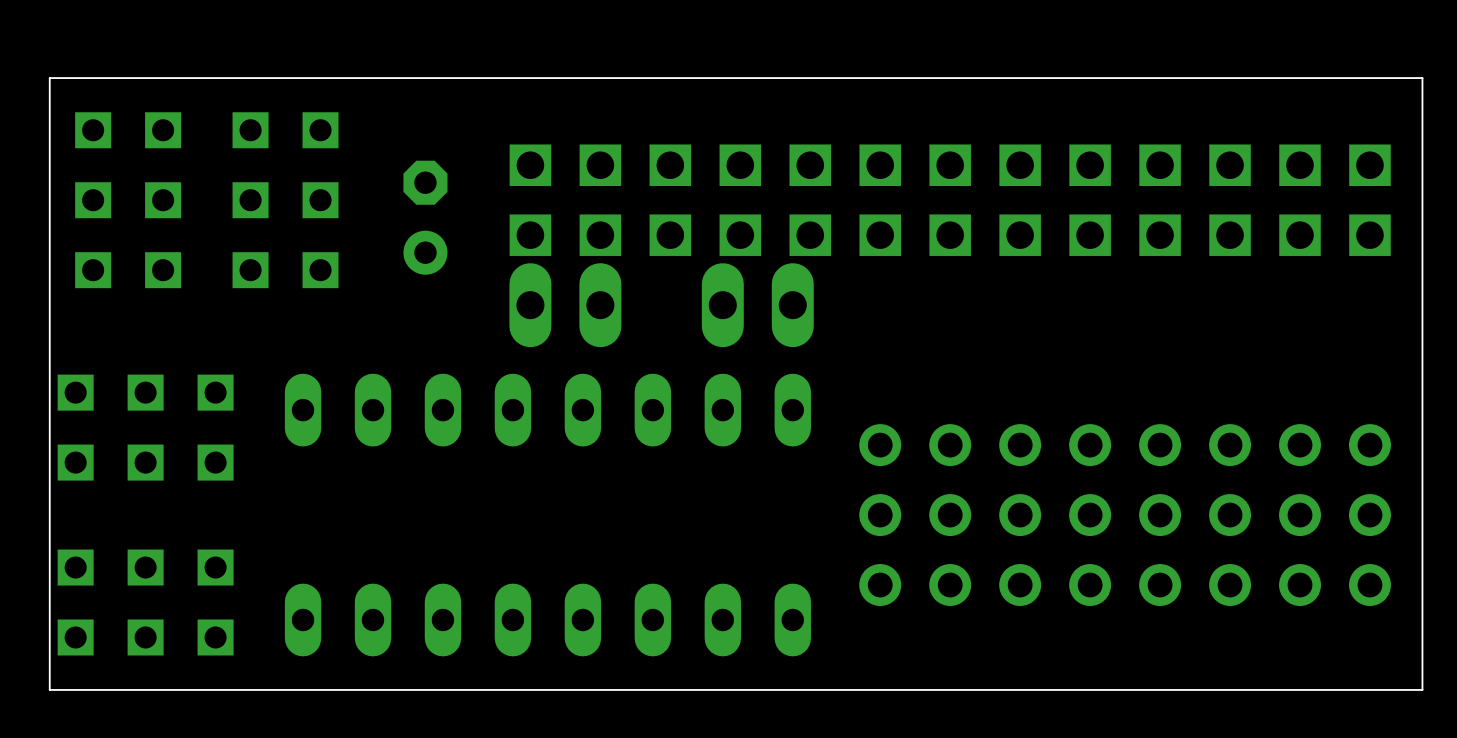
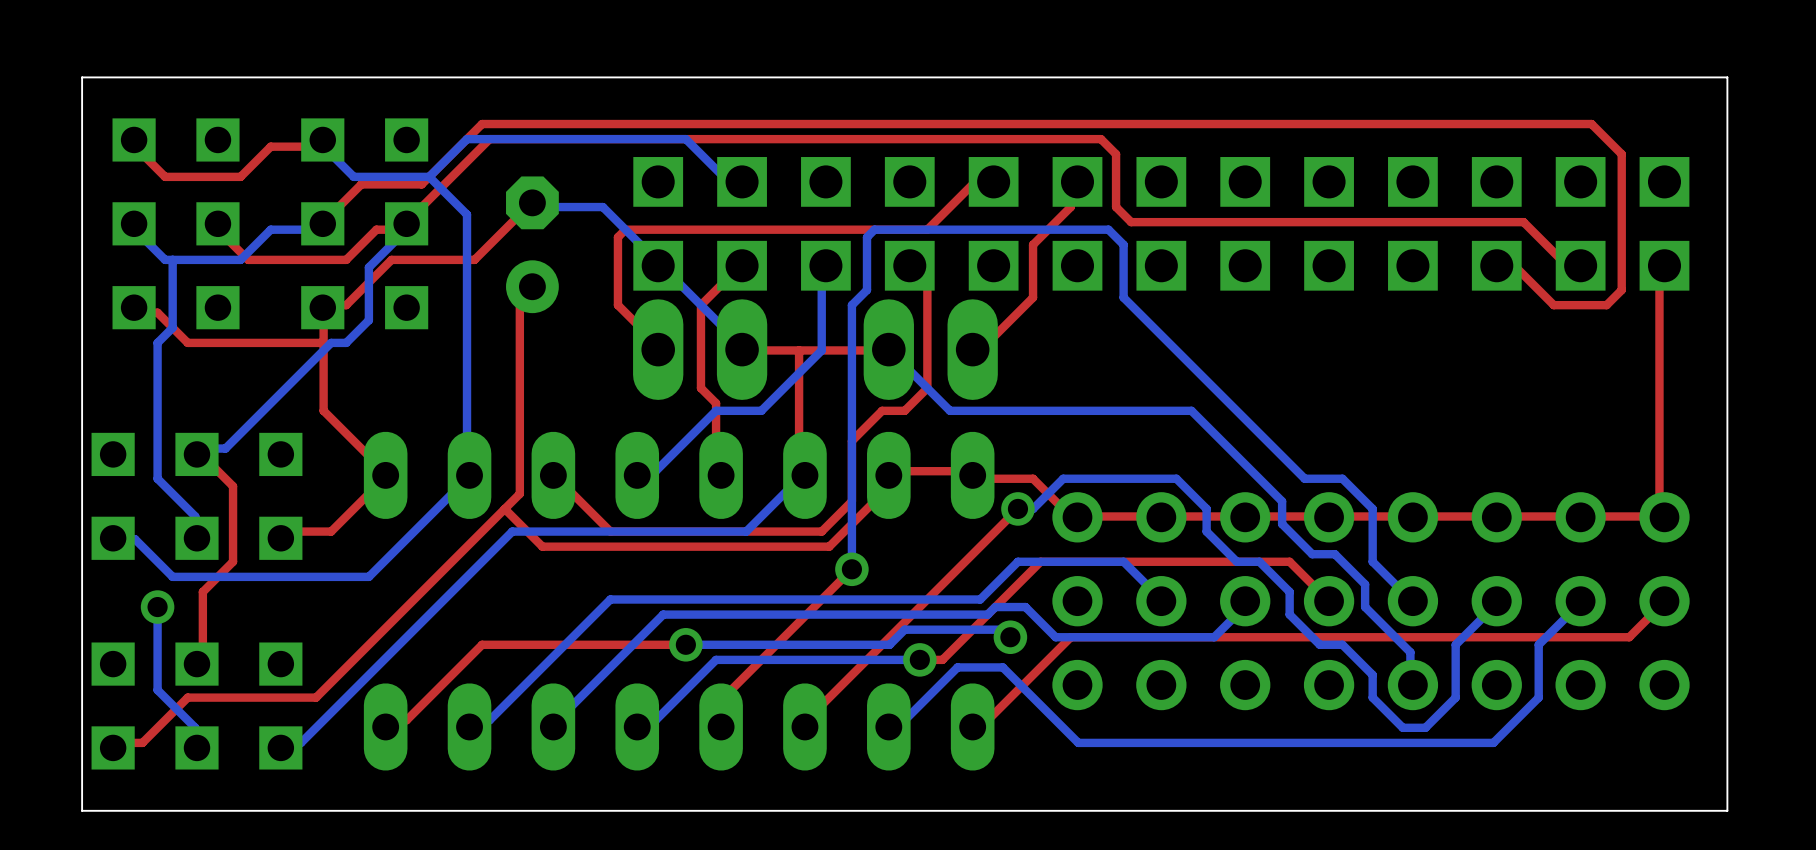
top track: none -> (322, 139) (316, 146) (270, 146) (240, 176) (165, 176) (134, 146) (134, 139)
bottom track: none -> (322, 139) (323, 146) (353, 176) (429, 176)
bottom track: none -> (429, 176) (467, 139) (685, 139) (723, 176) (738, 176) (742, 181)
bottom track: none -> (429, 176) (467, 214) (467, 471) (469, 475) (467, 478) (368, 576) (172, 576) (134, 539) (113, 538)
top track: none -> (993, 181) (987, 184) (972, 184) (927, 229) (625, 229) (617, 237) (617, 305) (655, 342) (658, 349)
top track: none -> (1077, 181) (1070, 184) (1070, 207) (1033, 244) (1033, 297) (987, 342) (972, 342) (972, 349)
top track: none -> (532, 202) (474, 259) (391, 259) (346, 305) (323, 305) (323, 410) (383, 471) (385, 475) (331, 531) (285, 531) (280, 538)
bottom track: none -> (532, 202) (534, 207) (602, 207) (655, 259) (658, 265) (663, 267) (738, 342) (742, 349)
top track: none -> (217, 223) (217, 229) (248, 259) (346, 259) (376, 229) (406, 229) (406, 222) (489, 139) (1100, 139) (1116, 154) (1116, 207) (1131, 222) (1523, 222) (1561, 259) (1576, 259) (1580, 265)
top track: none -> (322, 223) (361, 184) (421, 184) (482, 124) (1591, 124) (1621, 154) (1621, 290) (1606, 305) (1553, 305) (1516, 267) (1496, 265)
bottom track: none -> (322, 223) (316, 229) (270, 229) (240, 259) (165, 259) (134, 229) (134, 223)
bottom track: none -> (406, 223) (406, 229) (368, 267) (368, 320) (346, 342) (331, 342) (225, 448) (202, 448) (196, 454)
bottom track: none -> (172, 259) (172, 327) (157, 342) (157, 478) (195, 516) (196, 538)
top track: none -> (742, 265) (700, 305) (700, 388) (716, 403) (716, 471) (721, 475)
bottom track: none -> (825, 265) (821, 267) (821, 350) (761, 410) (716, 410) (655, 471) (640, 471) (637, 475)
top track: none -> (909, 265) (927, 282) (927, 388) (904, 410) (882, 410) (851, 441) (851, 501) (821, 531) (610, 531) (553, 475)
top track: none -> (1664, 265) (1659, 267) (1659, 516)
top track: none -> (532, 286) (519, 297) (519, 493) (316, 697) (187, 697) (142, 742) (119, 742) (113, 747)
top track: none -> (134, 307) (134, 312) (157, 312) (187, 342) (323, 342)
top track: none -> (799, 350) (799, 471) (804, 475)
top track: none -> (888, 349) (742, 349)
bottom track: none -> (888, 349) (950, 410) (1191, 410) (1282, 501) (1282, 524) (1312, 554) (1334, 554) (1365, 584) (1365, 607) (1410, 652) (1410, 682) (1412, 685)
top track: none -> (196, 454) (202, 456) (233, 486) (233, 561) (202, 591) (202, 659) (196, 664)
bottom track: none -> (804, 475) (799, 478) (746, 531) (512, 531) (300, 742) (285, 742) (280, 747)
top track: none -> (504, 508) (542, 546) (829, 546) (882, 493) (882, 478) (888, 475) (889, 471) (972, 471) (972, 478) (1033, 478) (1070, 516) (1077, 517) (1659, 516)
top track: none -> (1017, 508) (806, 720) (804, 726)
bottom track: none -> (1017, 508) (1033, 508) (1063, 478) (1176, 478) (1206, 508) (1206, 531) (1236, 561) (1259, 561) (1289, 591) (1289, 614) (1319, 644) (1342, 644) (1372, 674) (1372, 697) (1402, 727) (1425, 727) (1455, 697) (1455, 644) (1493, 607) (1496, 601)
via: none -> (1017, 508)
top track: none -> (851, 569) (723, 697) (723, 720) (721, 726)
bottom track: none -> (851, 569) (851, 305) (867, 290) (867, 237) (874, 229) (1108, 229) (1123, 244) (1123, 297) (1304, 478) (1342, 478) (1372, 508) (1372, 561) (1412, 601)
via: none -> (851, 569)
bottom track: none -> (1161, 601) (1123, 561) (1017, 561) (980, 599) (610, 599) (489, 720) (474, 720) (469, 726)
bottom track: none -> (1245, 601) (1244, 607) (1214, 637) (1055, 637) (1025, 607) (995, 607) (987, 614) (663, 614) (557, 720) (553, 726)
top track: none -> (1329, 601) (1289, 561) (1040, 561) (942, 659) (919, 659)
bottom track: none -> (1580, 601) (1538, 644) (1538, 697) (1493, 742) (1078, 742) (1002, 667) (957, 667) (904, 720) (889, 720) (888, 726)
top track: none -> (1664, 601) (1629, 637) (1070, 637) (987, 720) (972, 720) (972, 726)
bottom track: none -> (157, 607) (157, 690) (195, 727) (196, 747)
via: none -> (157, 607)
bottom track: none -> (1010, 637) (1002, 629) (904, 629) (889, 644) (685, 644)
via: none -> (1010, 637)
top track: none -> (685, 644) (482, 644) (406, 720) (391, 720) (385, 726)
via: none -> (685, 644)
bottom track: none -> (919, 659) (716, 659) (655, 720) (640, 720) (637, 726)
via: none -> (919, 659)

